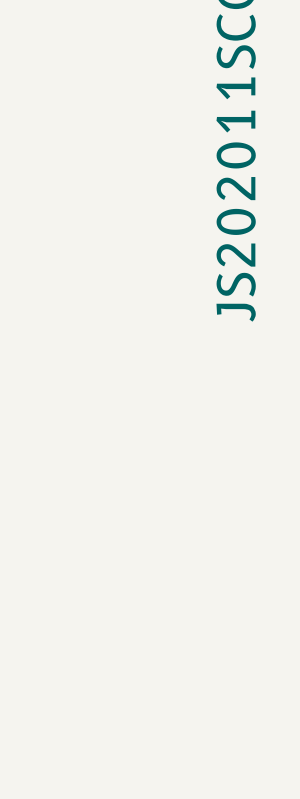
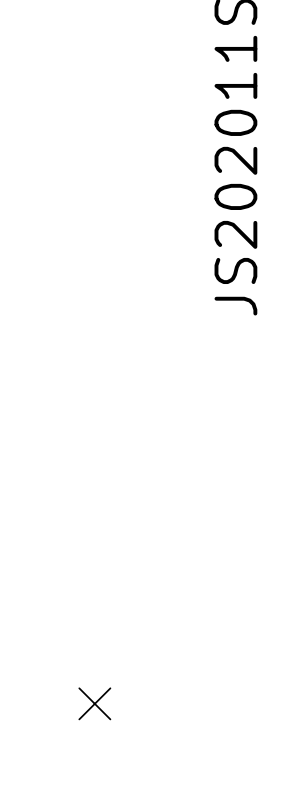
no-connect mark: none -> (94, 703)

